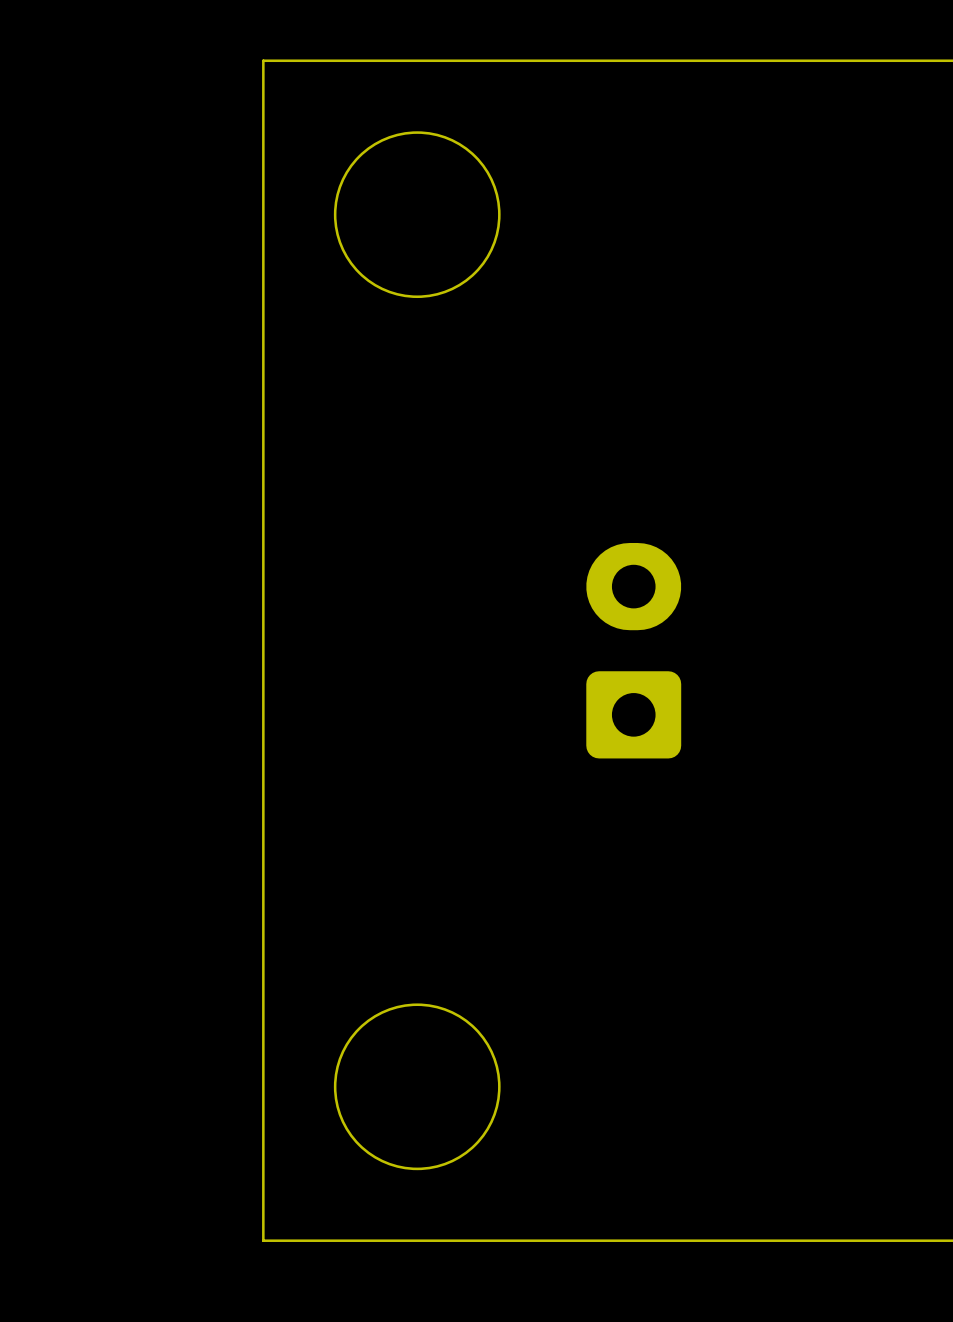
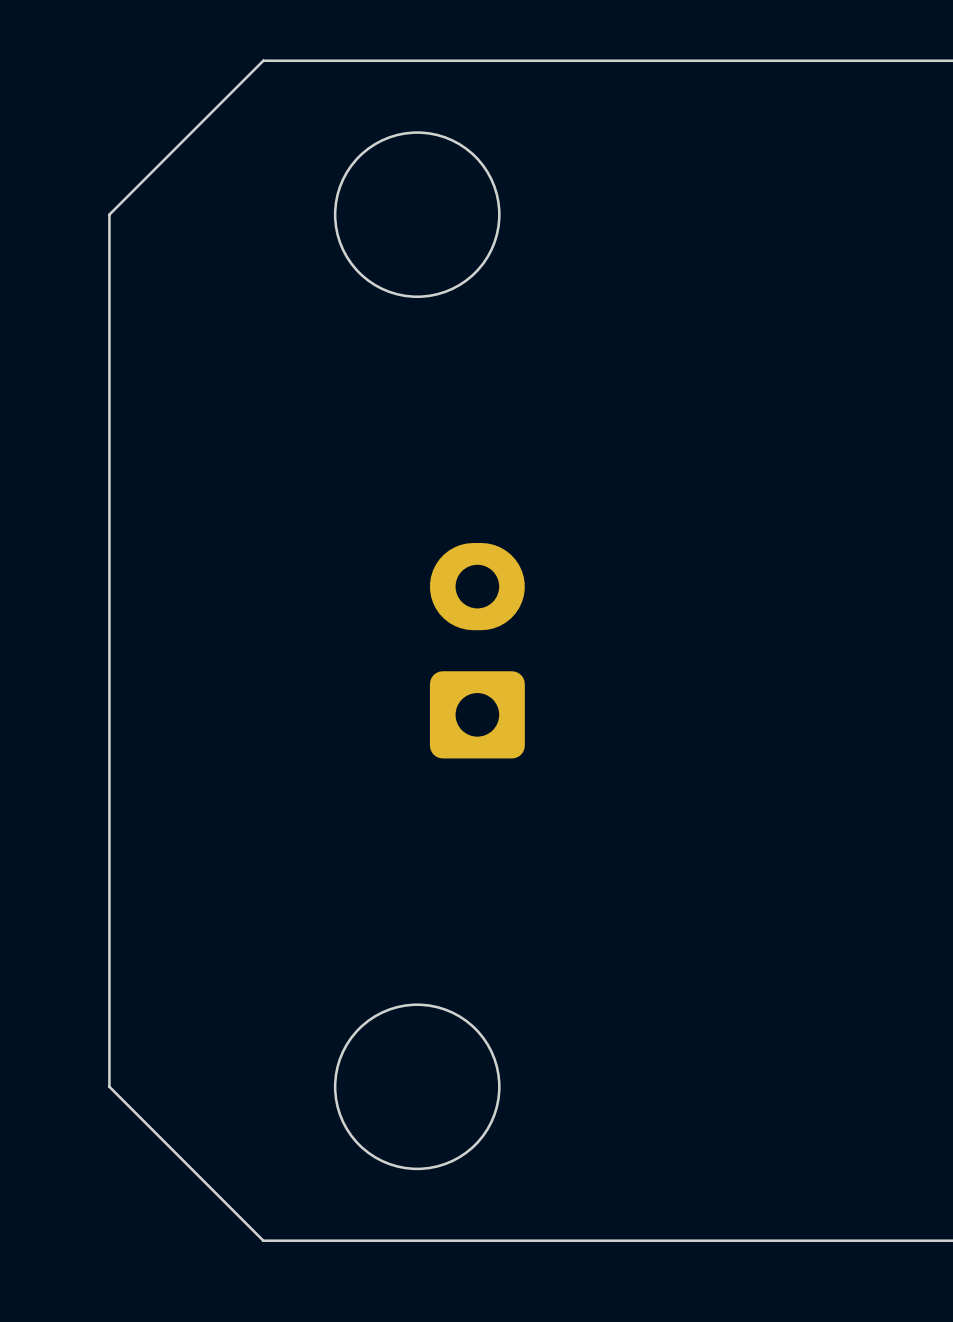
board edge: (263, 60) (263, 1240) -> (263, 60) (109, 214) (109, 1086) (263, 1240)
part position: (633, 650) -> (477, 650)

